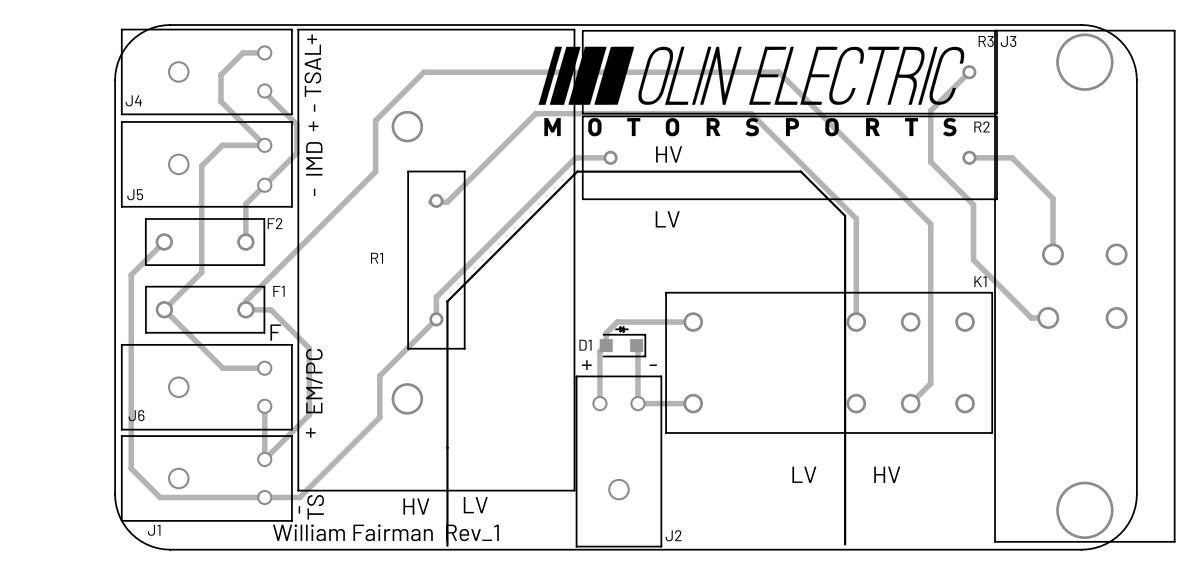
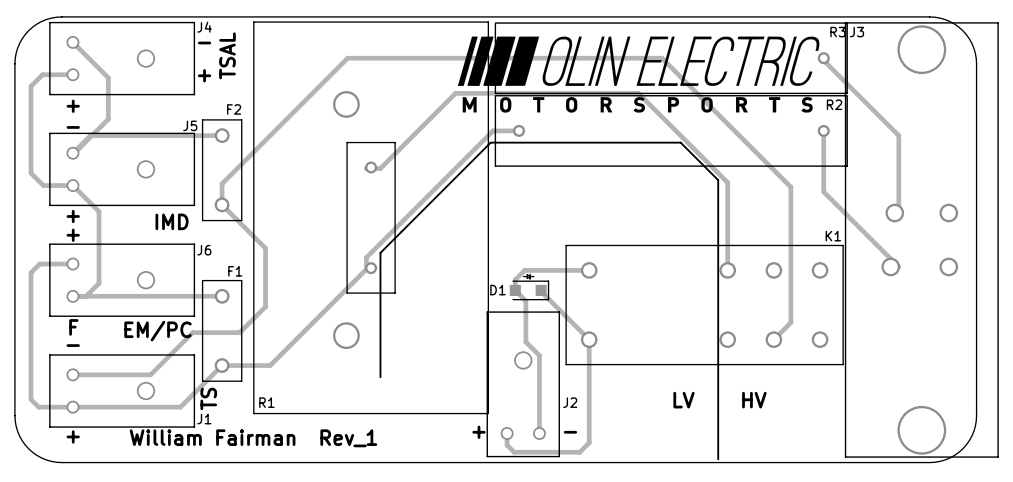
board edge: (170, 24) (1081, 24) (1105, 30) (1120, 41) (1128, 50) (1135, 67) (1136, 80) (1136, 494) (1131, 518) (1120, 533) (1111, 541) (1099, 546) (1081, 549) (170, 549) (146, 544) (127, 528) (118, 512) (115, 500) (115, 80) (120, 56) (131, 41) (146, 30) (170, 24) -> (61, 16) (41, 21) (28, 30) (19, 43) (14, 63) (15, 420) (22, 440) (28, 448) (41, 457) (61, 462) (929, 462) (945, 459) (954, 455) (962, 448) (971, 436) (976, 415) (976, 63) (975, 53) (969, 38) (962, 30) (950, 21) (929, 16) (61, 16)
text: + (312, 39) -> none
track: (264, 52) (243, 52) (220, 74) (220, 101) (264, 145) -> none
track: none -> (72, 42) (108, 77) (108, 119) (74, 153) (72, 153) (90, 135) (222, 135)
text: none -> - (204, 43)
text position: TSAL (312, 70) -> TSAL (227, 55)
J4 rotation: 0° (206, 71) -> 180° (122, 58)
track: (423, 72) (375, 120) (375, 171) (245, 301) (245, 309) (270, 309) (309, 348) (309, 414) (264, 459) (264, 406) -> (360, 58) (347, 58) (222, 183) (222, 204) (265, 248) (265, 306) (239, 332) (192, 332) (150, 374) (72, 374)
track: (969, 72) (930, 110) (930, 161) (973, 204) (973, 260) (1031, 318) (1048, 318) -> none
track: none -> (823, 60) (898, 135) (898, 213)
track: (264, 90) (296, 124) (296, 153) (245, 204) (245, 242) -> none
track: none -> (72, 74) (42, 74) (31, 86) (31, 173) (43, 185) (72, 185) (99, 211) (99, 283) (86, 296) (72, 296)
text: none -> + (204, 75)
J4 name position: J4 (133, 100) -> J4 (204, 27)
text: - (314, 108) -> none
J5 footprint: [120, 121, 293, 208] -> [49, 132, 196, 207]
text: + (313, 126) -> none
text: none -> + (73, 106)
track: (264, 145) (222, 145) (201, 166) (201, 272) (164, 309) (222, 368) (264, 368) -> none
text: none -> - (73, 127)
text: HV (669, 154) -> none
track: (580, 157) (575, 157) (436, 297) (436, 319) (379, 375) (379, 417) (299, 497) (160, 497) (131, 468) (131, 275) (164, 241) -> (493, 130) (366, 257) (366, 269) (270, 365) (222, 365) (180, 407) (38, 407) (31, 399) (31, 272) (39, 264) (72, 264)
track: (969, 157) (1012, 157) (1053, 198) (1053, 254) -> (823, 130) (823, 191) (898, 266)
text rotation: 0° (314, 158) -> 90° clockwise (172, 221)
text position: IMD (314, 158) -> IMD (172, 221)
text: - (314, 192) -> none
J5 name position: J5 (135, 194) -> J5 (190, 125)
text: LV (667, 219) -> none
F2 name position: F2 (275, 223) -> F2 (234, 109)
F2 rotation: 0° (205, 242) -> 90° clockwise (222, 170)
text: none -> + (73, 216)
R1 name position: R1 (377, 258) -> R1 (266, 402)
text: none -> + (73, 235)
F1 name position: F1 (278, 291) -> F1 (235, 271)
F1 rotation: 0° (205, 309) -> 90° clockwise (222, 330)
F1 position: (205, 309) -> (222, 330)
text position: F (275, 332) -> F (73, 327)
track: (606, 345) (599, 351) (599, 403) -> (515, 290) (525, 300) (525, 342) (539, 355) (539, 433)
track: (636, 345) (637, 403) (693, 403) -> none
track: none -> (541, 291) (589, 339) (589, 442) (579, 452) (514, 452) (507, 445) (507, 433)
track: none -> (73, 296) (222, 296)
text: + (586, 365) -> none
text position: - (653, 365) -> - (570, 432)
text rotation: 0° (314, 381) -> 90° clockwise (157, 331)
text position: EM/PC (314, 381) -> EM/PC (157, 331)
J6 rotation: 0° (206, 387) -> 180° (122, 280)
text: none -> - (73, 345)
J6 name position: J6 (136, 415) -> J6 (204, 250)
text: + (310, 432) -> none
line: (447, 447) (447, 545) -> none
J2 rotation: 0° (618, 461) -> 180° (523, 384)
J1 rotation: 0° (206, 478) -> 180° (122, 391)
text: LV (475, 505) -> none
text: HV (416, 506) -> none
text position: TS (315, 507) -> TS (208, 398)
text: - (299, 509) -> none
text: none -> + (478, 432)
text: none -> + (73, 436)
J1 name position: J1 (154, 530) -> J1 (204, 419)
text position: William Fairman Rev_1 (385, 532) -> William Fairman Rev_1 (253, 438)
J2 name position: J2 (673, 535) -> J2 (570, 402)

